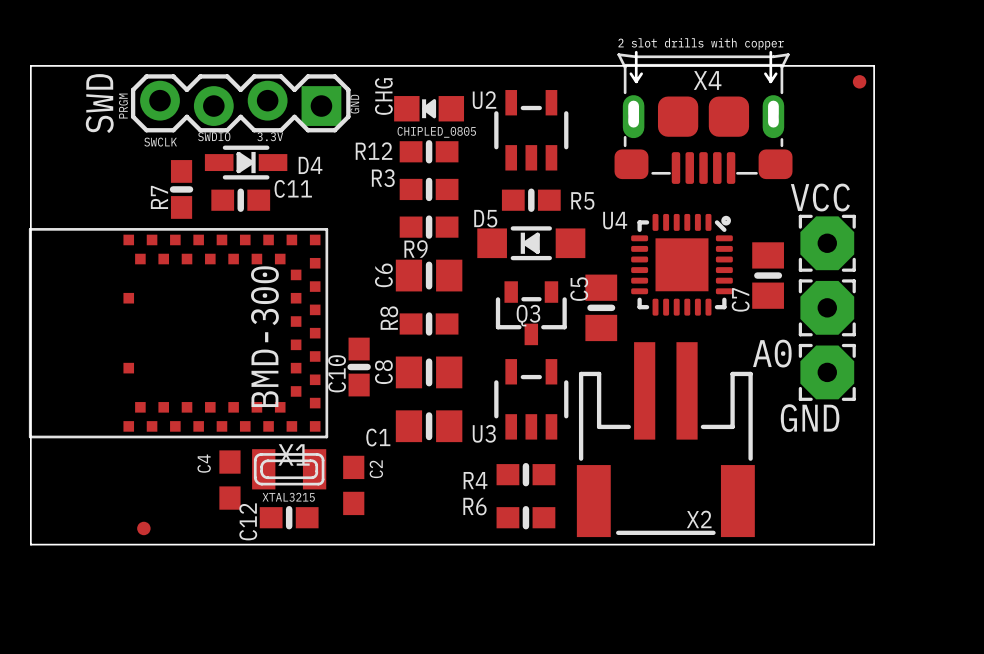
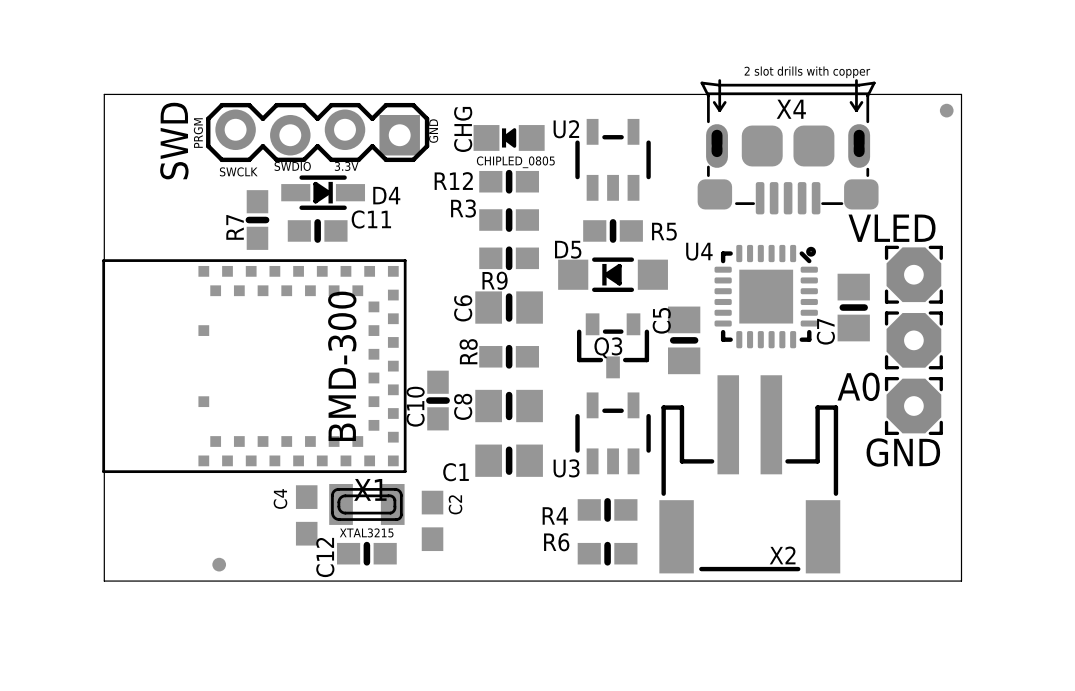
VCC name: VCC (820, 197) -> VLED (892, 228)

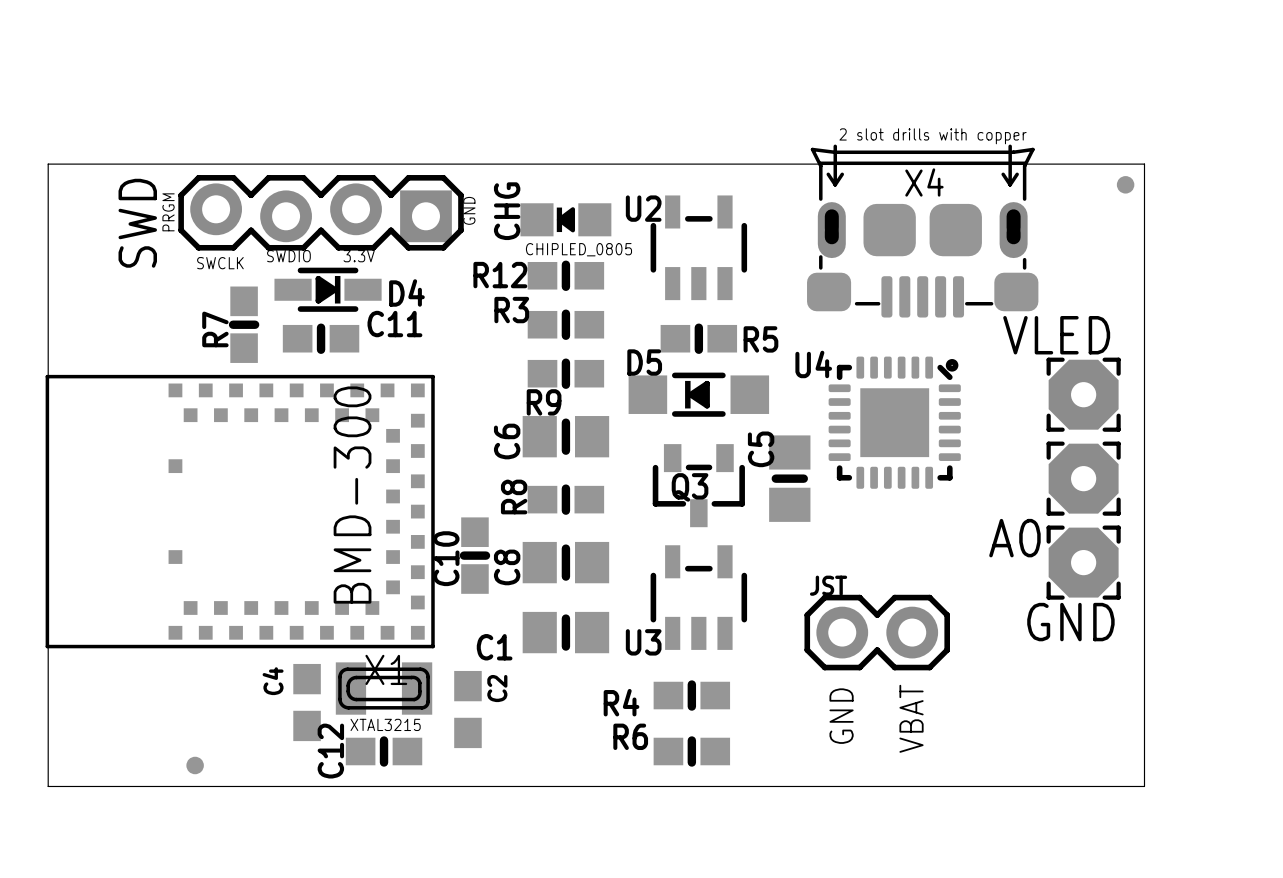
C7: (853, 307) -> none
JST: none -> (877, 632)
X2: (749, 474) -> none
text: none -> GND (841, 716)
text: none -> VBAT (911, 718)

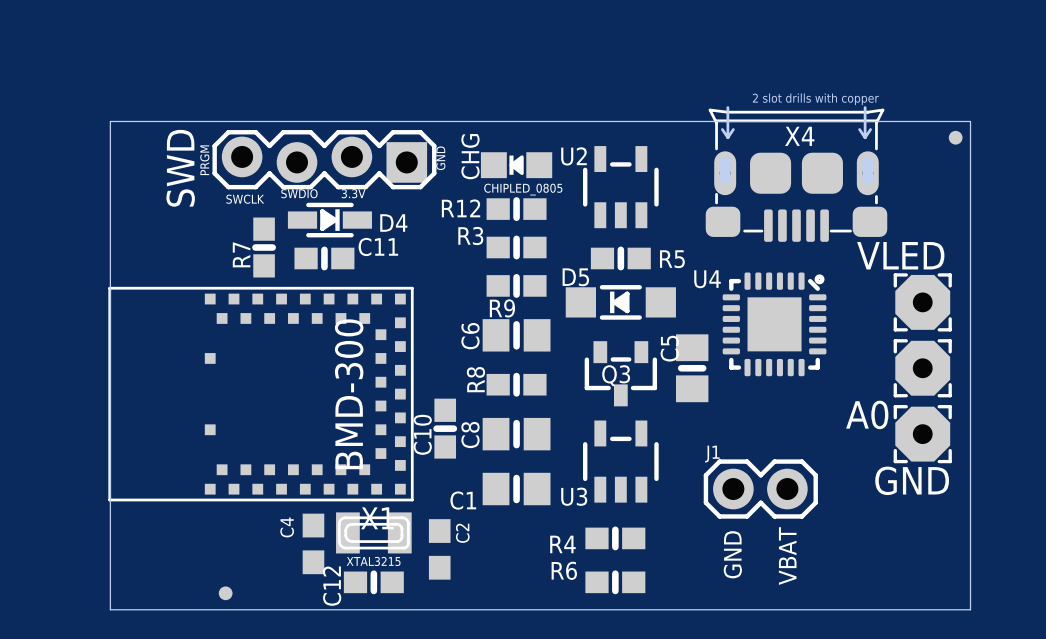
JST: (877, 632) -> none
J1: none -> (760, 489)

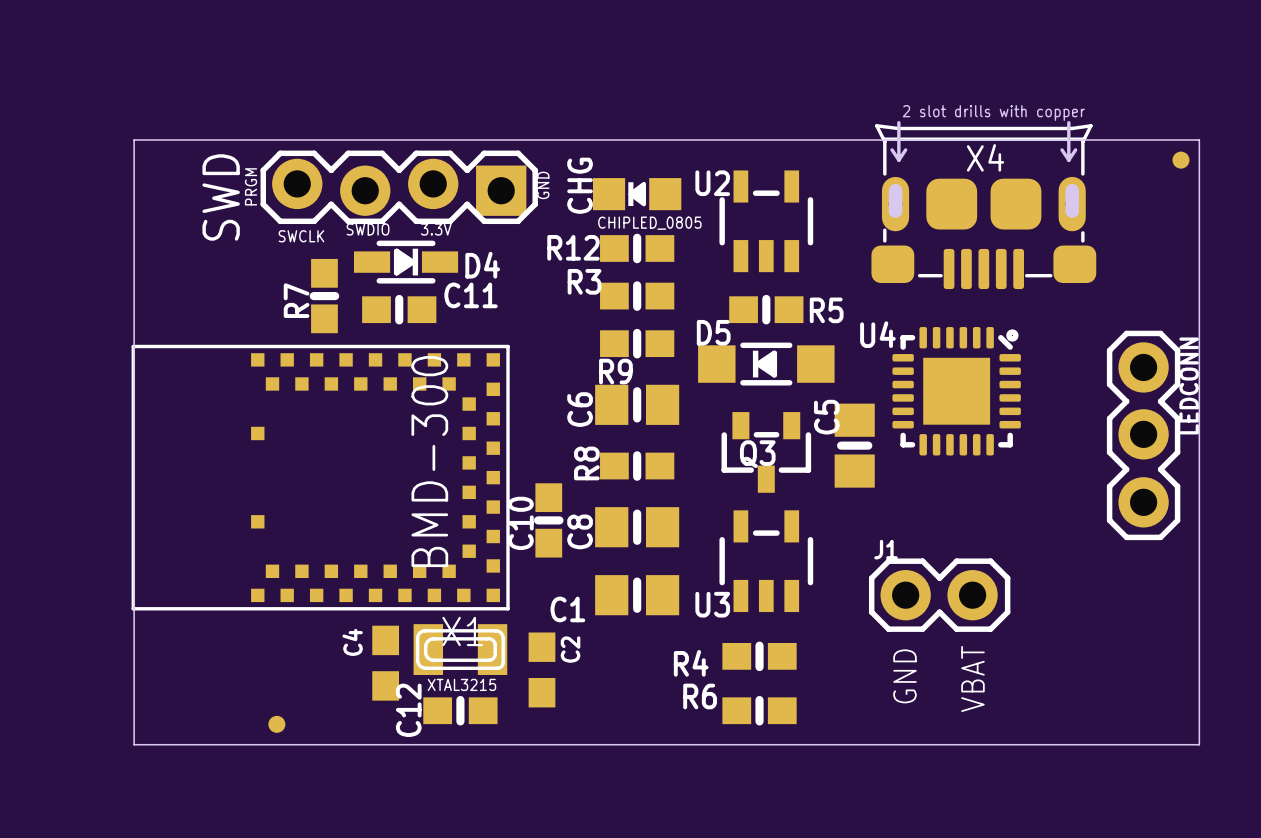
VLED: (922, 302) -> none
LEDCONN: none -> (1143, 435)
A0: (922, 368) -> none
GND: (922, 434) -> none

